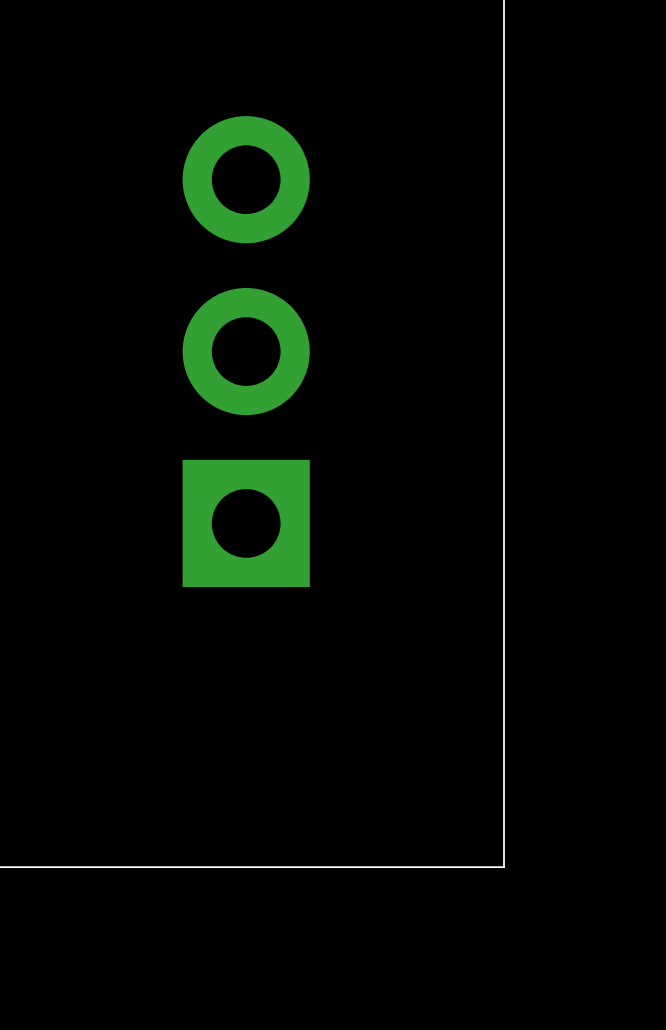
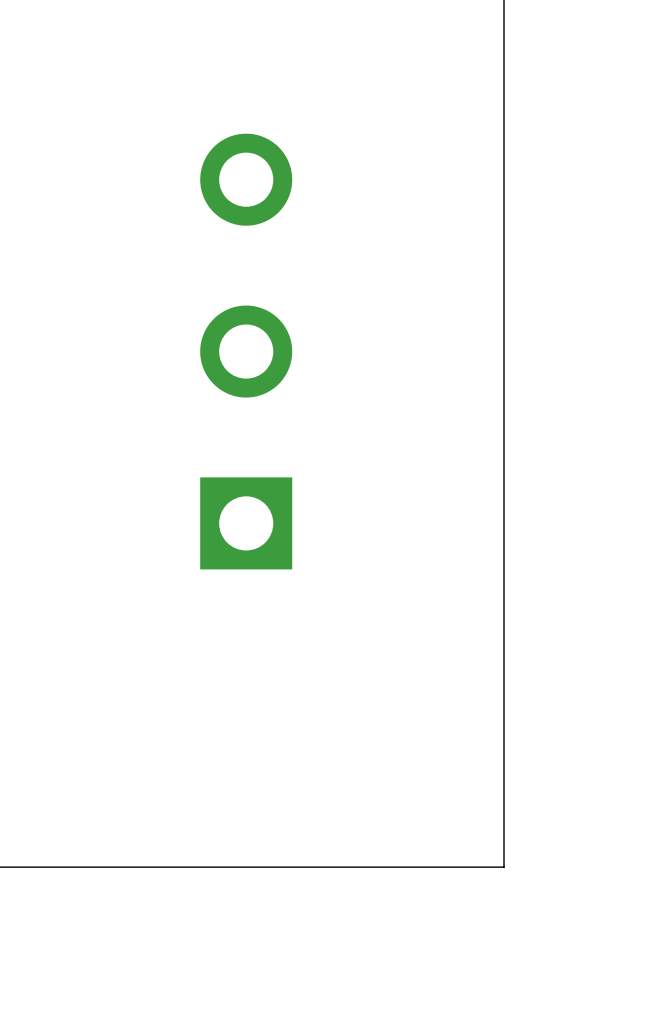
part footprint: [182, 116, 310, 588] -> [200, 133, 293, 570]

